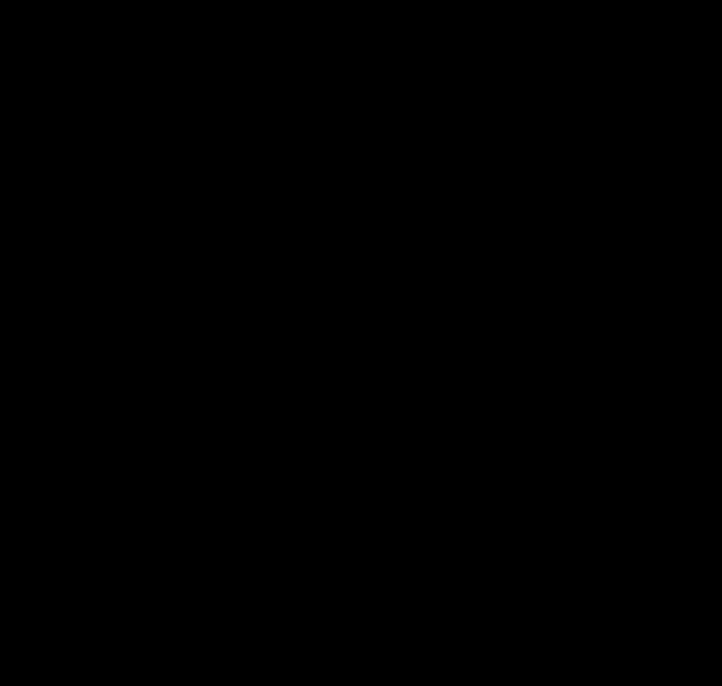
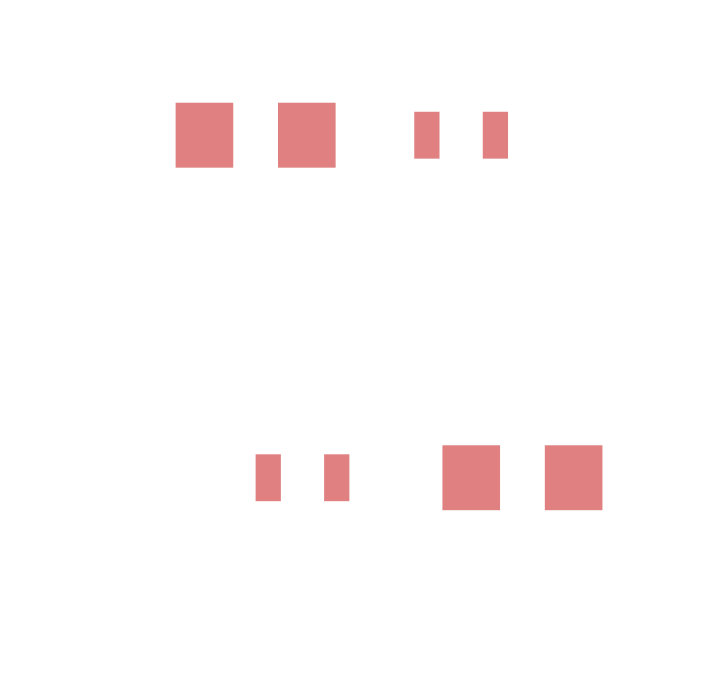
part: none -> (255, 135)
part: none -> (461, 135)
part: none -> (302, 477)
part: none -> (522, 477)

